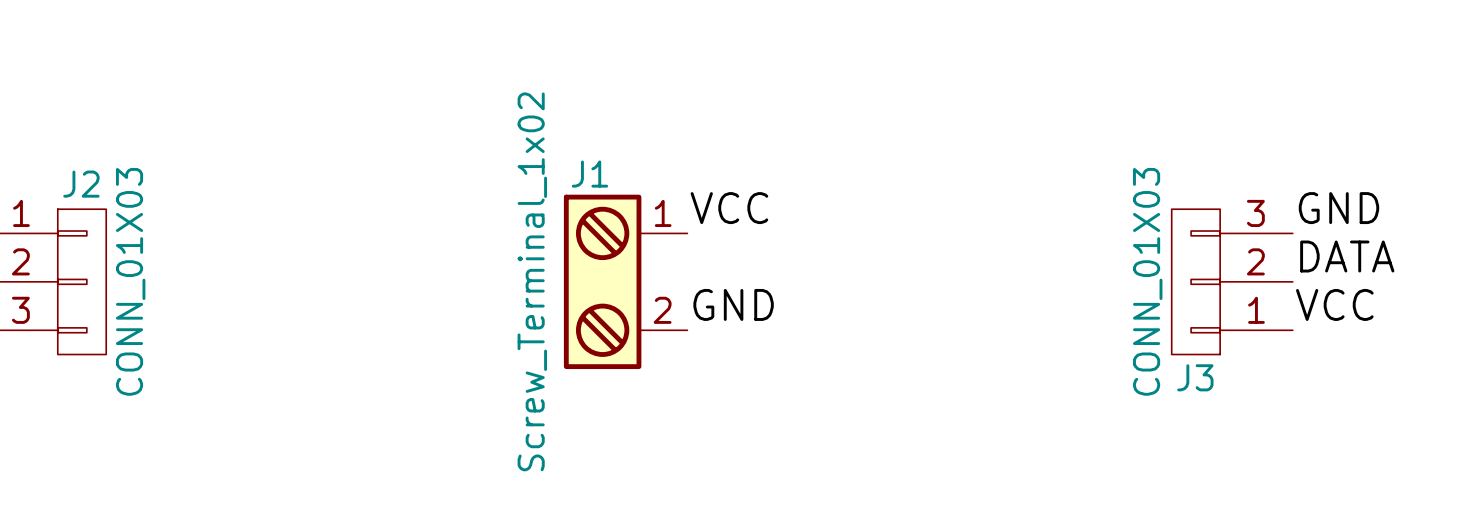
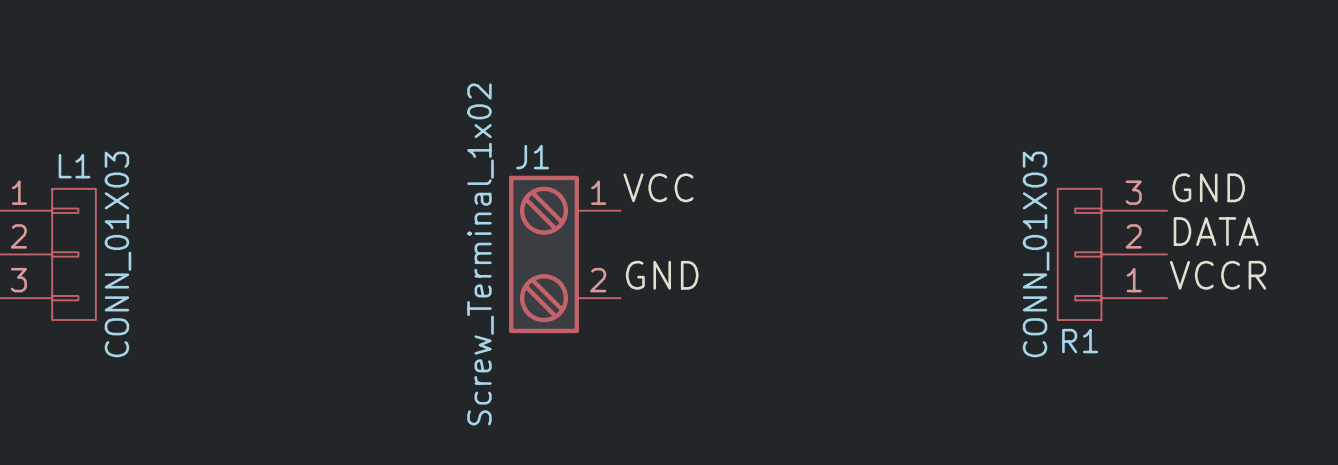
J2 name: J2 (81, 184) -> L1 (74, 166)
label: VCC (1334, 304) -> VCCR (1218, 275)
J3 name: J3 (1195, 377) -> R1 (1080, 341)

